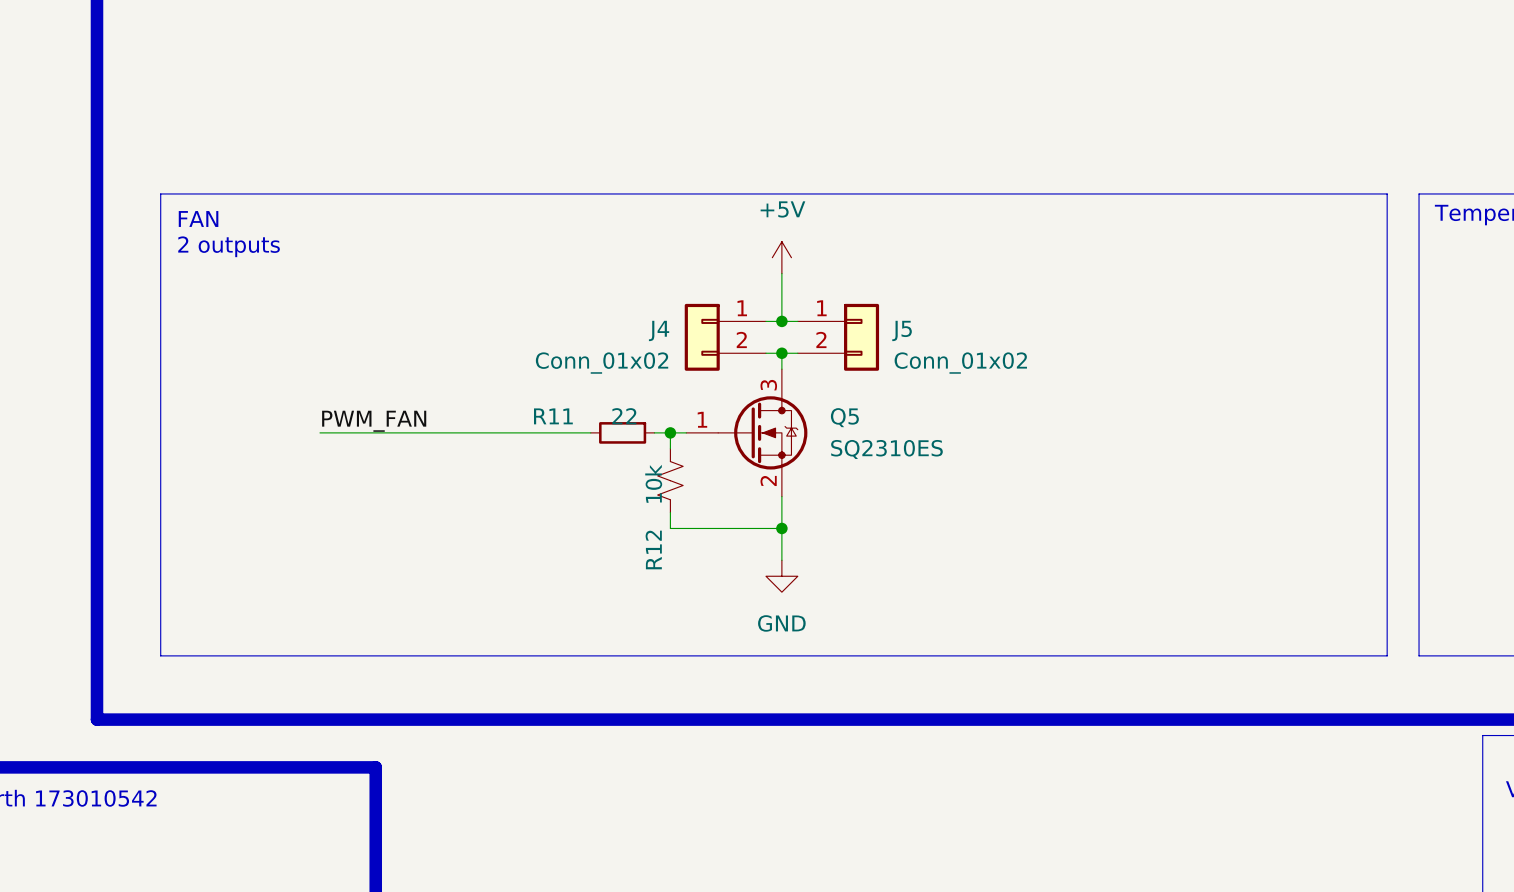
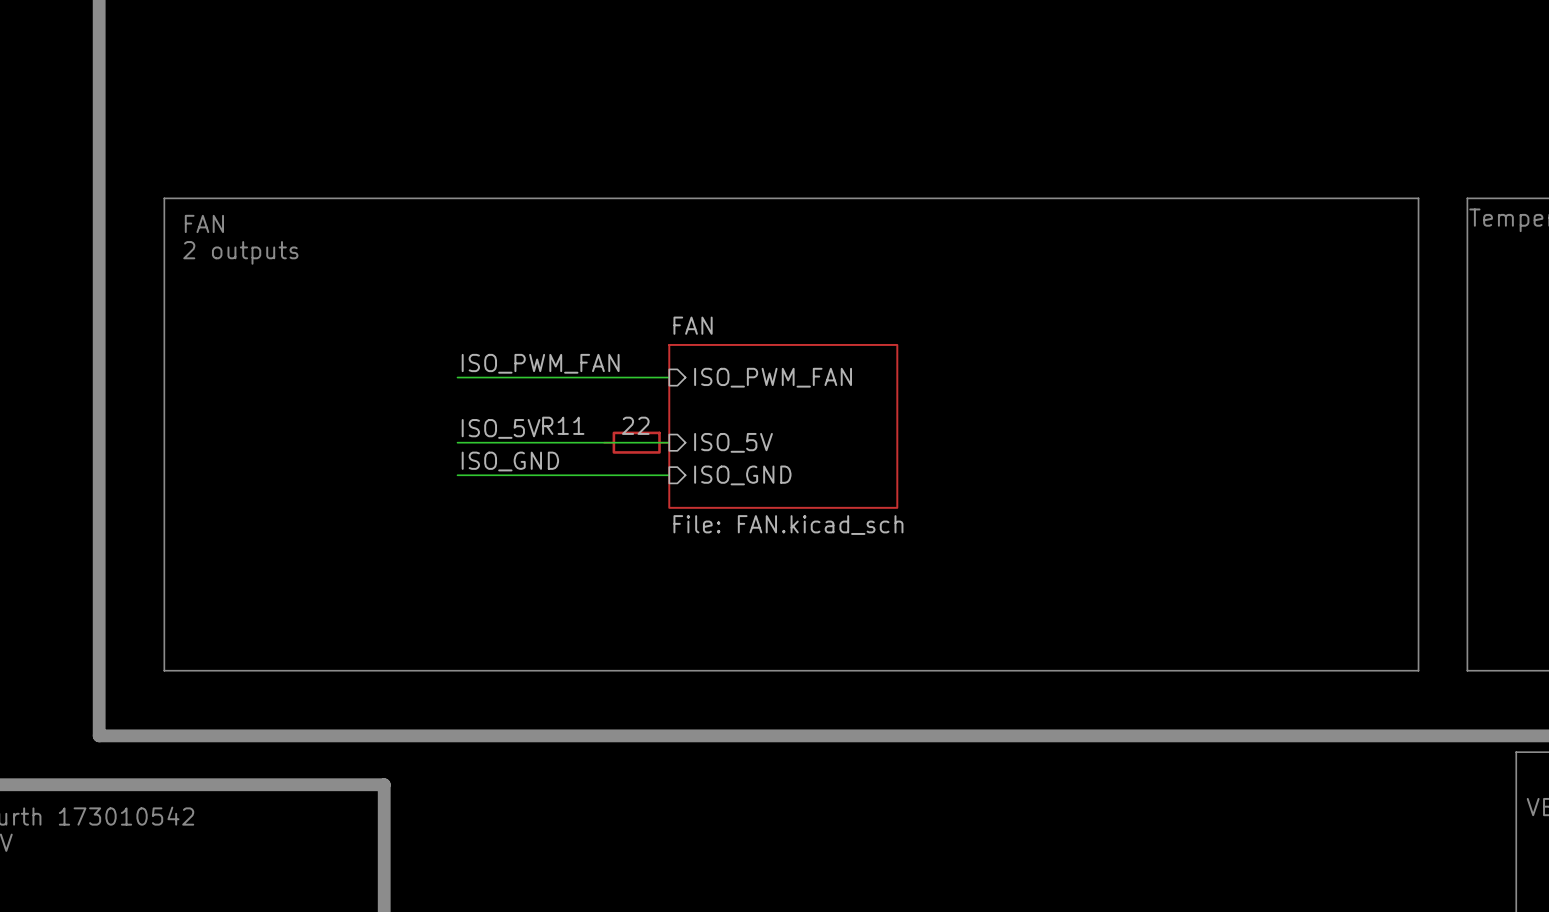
line: (1434, 193) (1419, 193) (1419, 655) (1434, 655) -> (1467, 198) (1467, 670)
power symbol: +5V (781, 257) -> none
wire: (781, 273) (781, 321) -> none
wire: (765, 321) (797, 321) -> none
junction: (781, 321) -> none
J4: Conn_01x02 (725, 337) -> none
J5: Conn_01x02 (838, 337) -> none
wire: (765, 353) (797, 353) -> none
wire: (781, 353) (781, 369) -> none
junction: (781, 353) -> none
label: none -> ISO_PWM_FAN (540, 363)
wire: none -> (457, 377) (669, 377)
sheet pin: none -> ISO_PWM_FAN (773, 377)
sheet FAN: none -> File: FAN.kicad_sch (783, 426)
label: PWM_FAN (374, 421) -> none
label: none -> ISO_5V (501, 428)
wire: (319, 432) (447, 432) -> none
wire: (654, 432) (686, 432) -> (669, 442) (604, 442)
wire: (670, 432) (670, 448) -> none
junction: (670, 432) -> none
Q5: SQ2310ES (746, 432) -> none
sheet pin: none -> ISO_5V (733, 442)
label: none -> ISO_GND (510, 461)
wire: none -> (457, 475) (669, 475)
sheet pin: none -> ISO_GND (742, 475)
R12: 10k (670, 480) -> none
wire: (781, 496) (781, 560) -> none
wire: (670, 512) (670, 528) (781, 528) -> none
junction: (781, 528) -> none
power symbol: GND (781, 576) -> none

